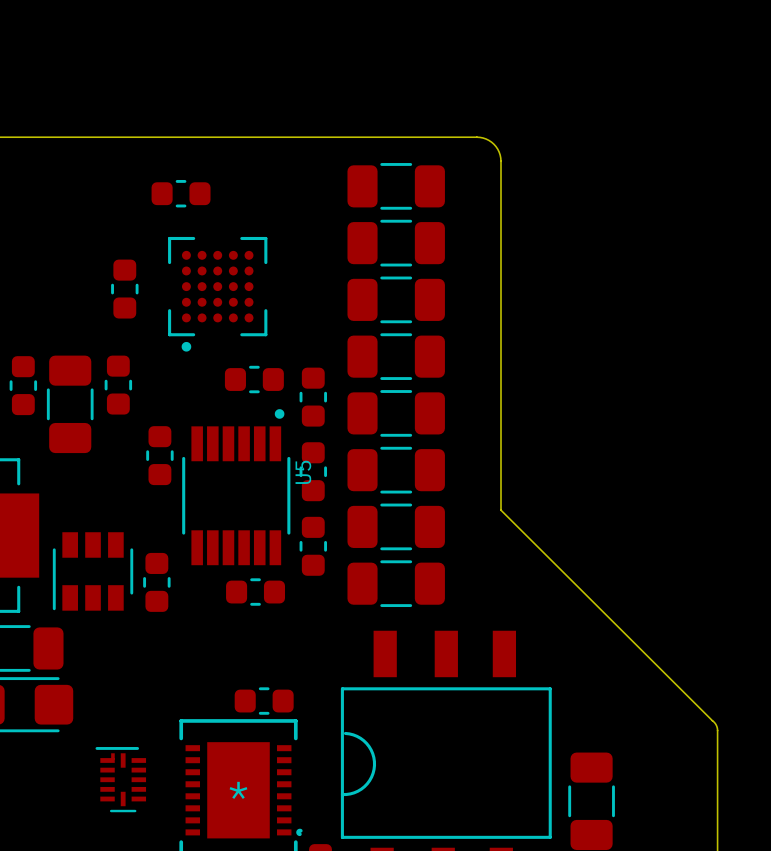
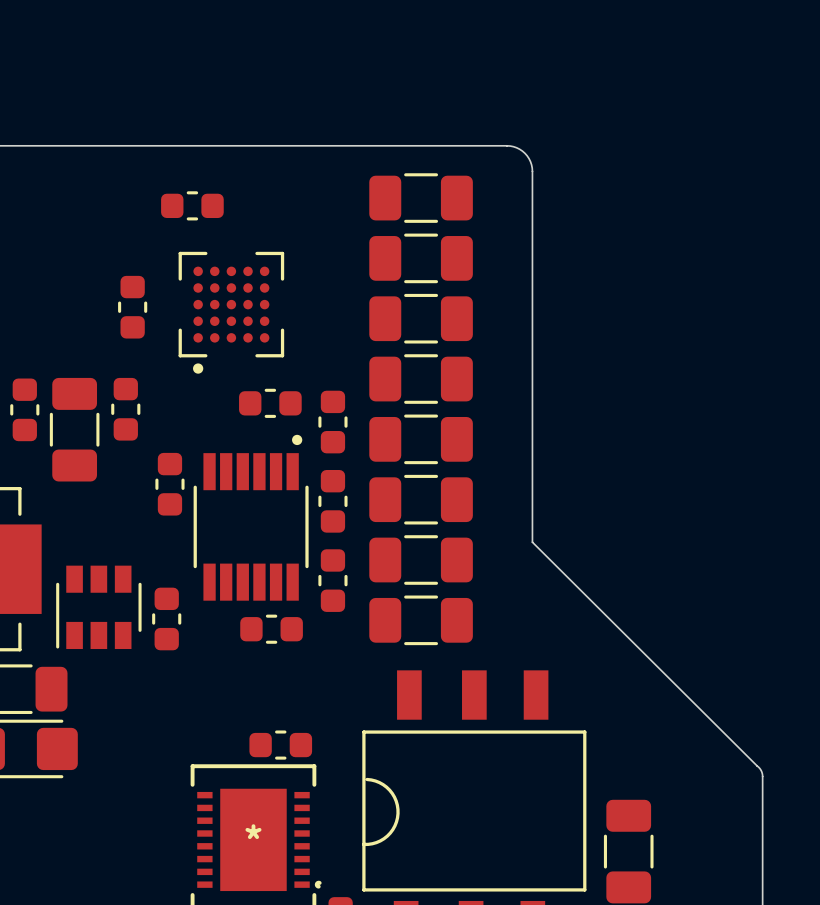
U5 name: U5 (303, 472) -> none
part: (120, 779) -> none

